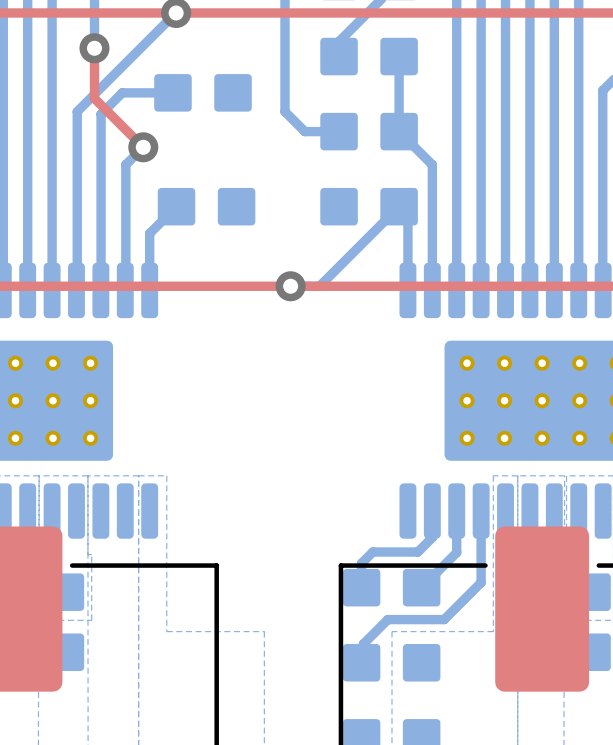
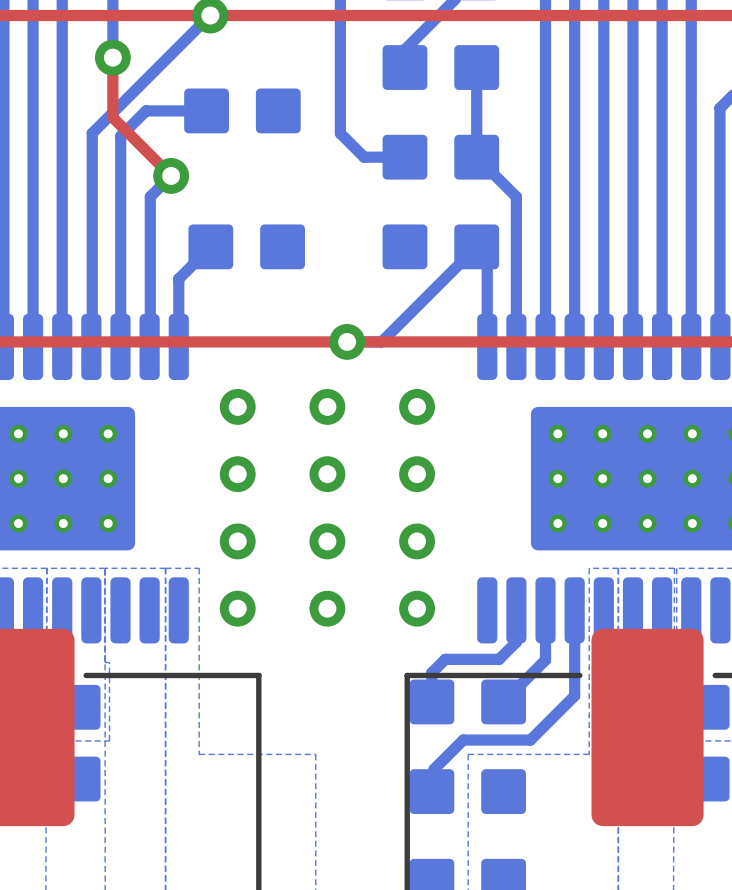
via: none -> (237, 406)
via: none -> (327, 406)
via: none -> (417, 406)
via: none -> (237, 474)
via: none -> (327, 474)
via: none -> (417, 474)
via: none -> (237, 541)
via: none -> (327, 541)
via: none -> (417, 541)
via: none -> (237, 608)
via: none -> (327, 608)
via: none -> (417, 608)

